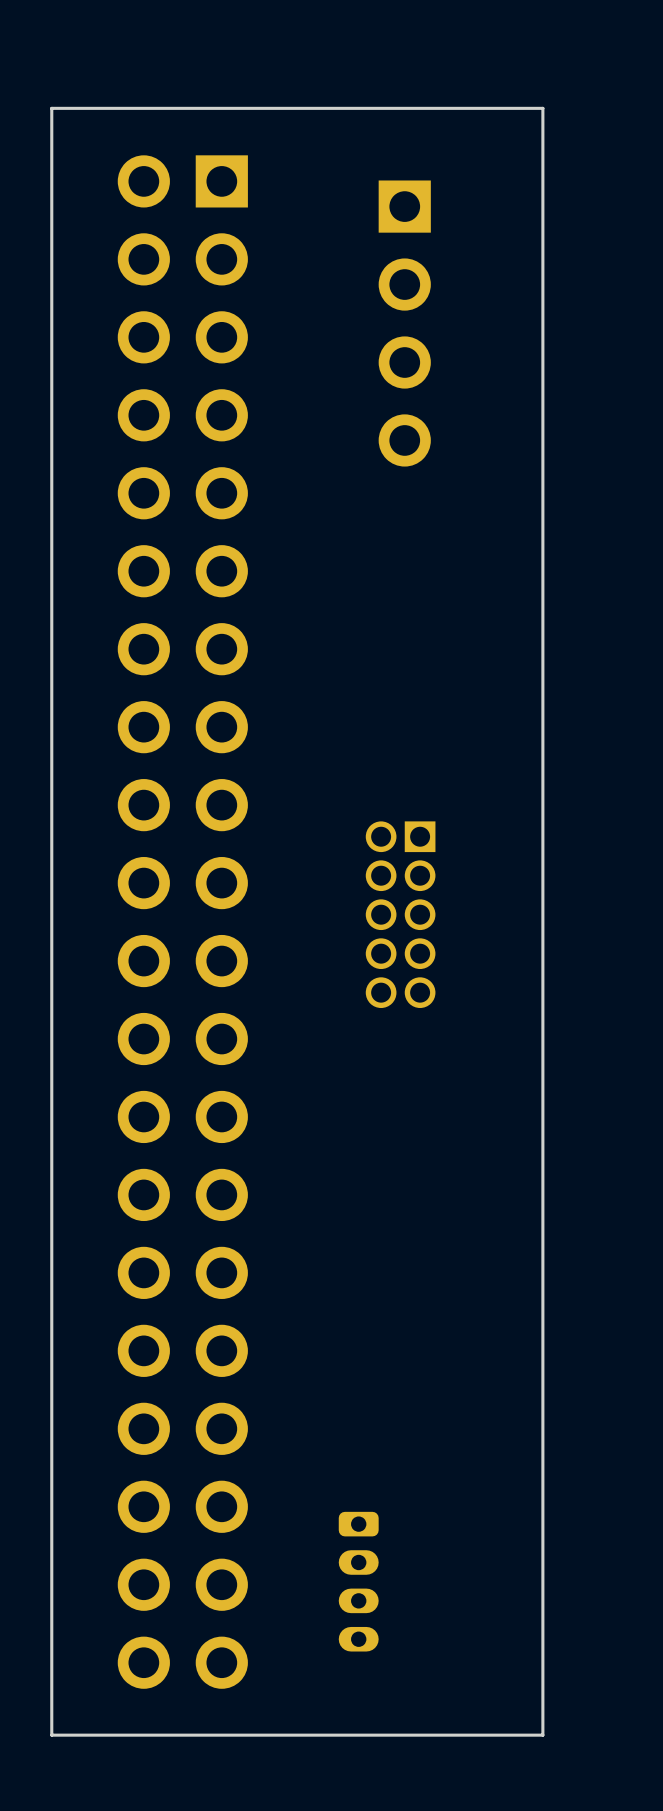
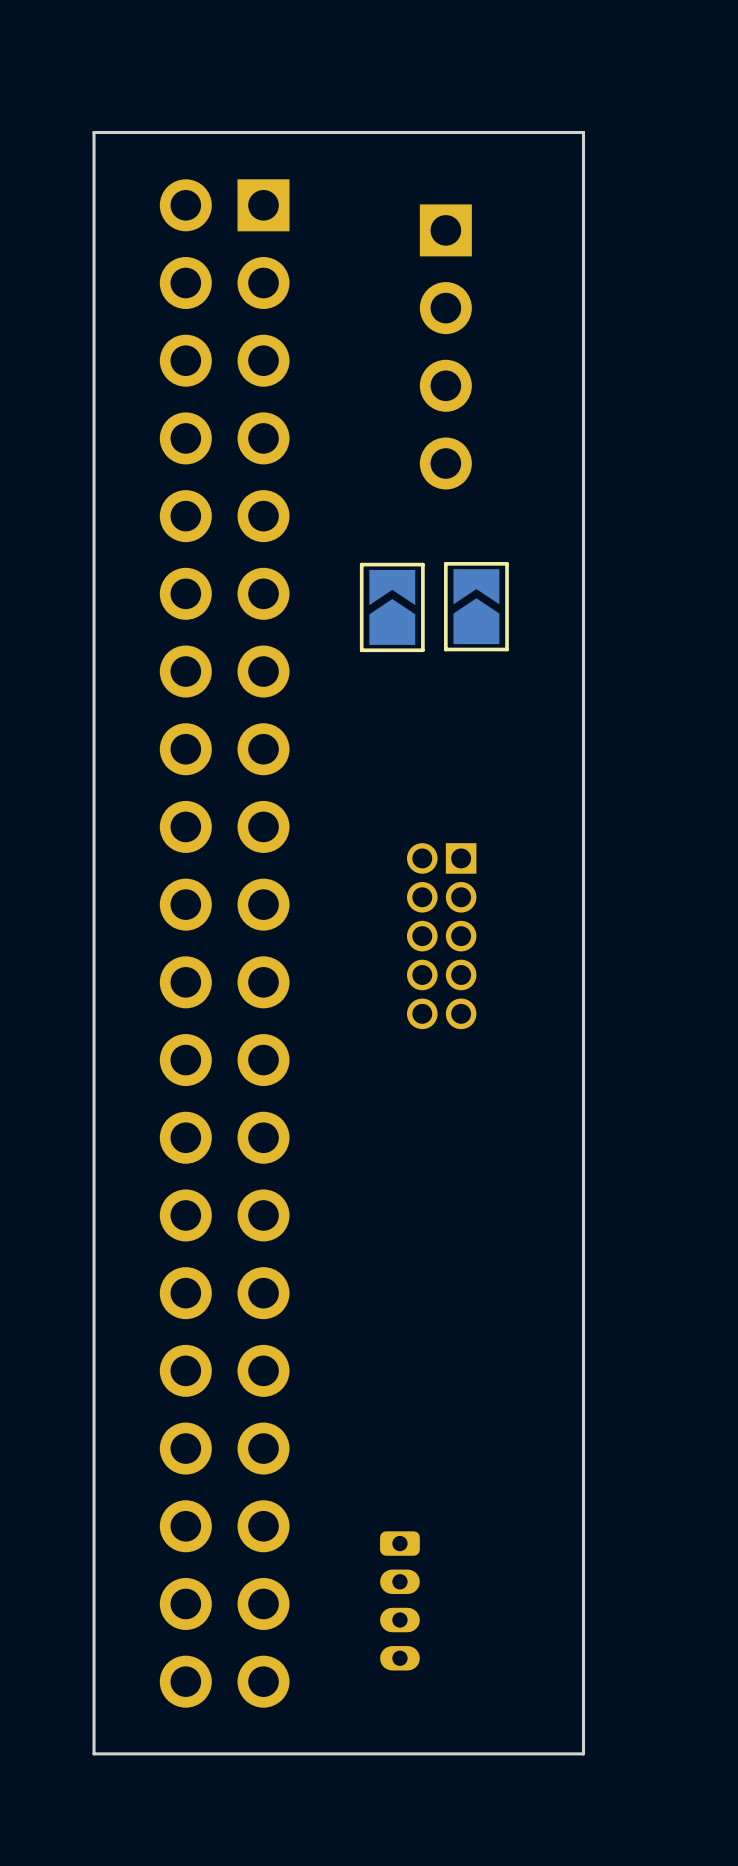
part: none -> (392, 607)
part: none -> (476, 606)

